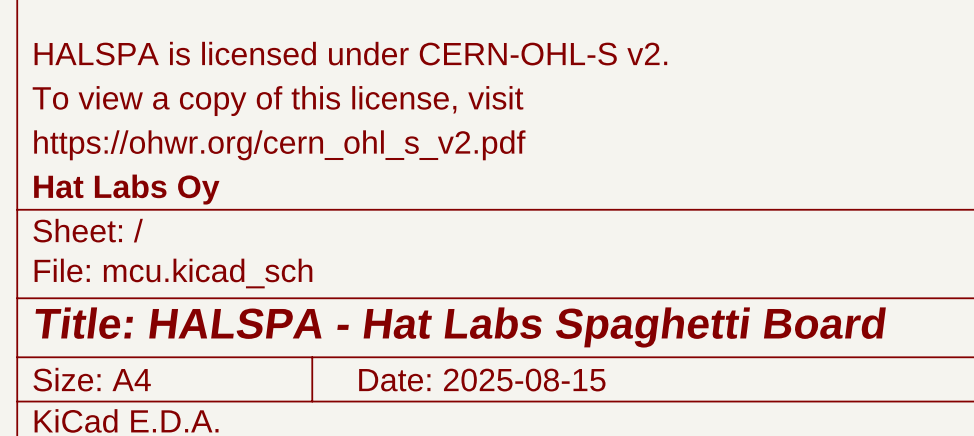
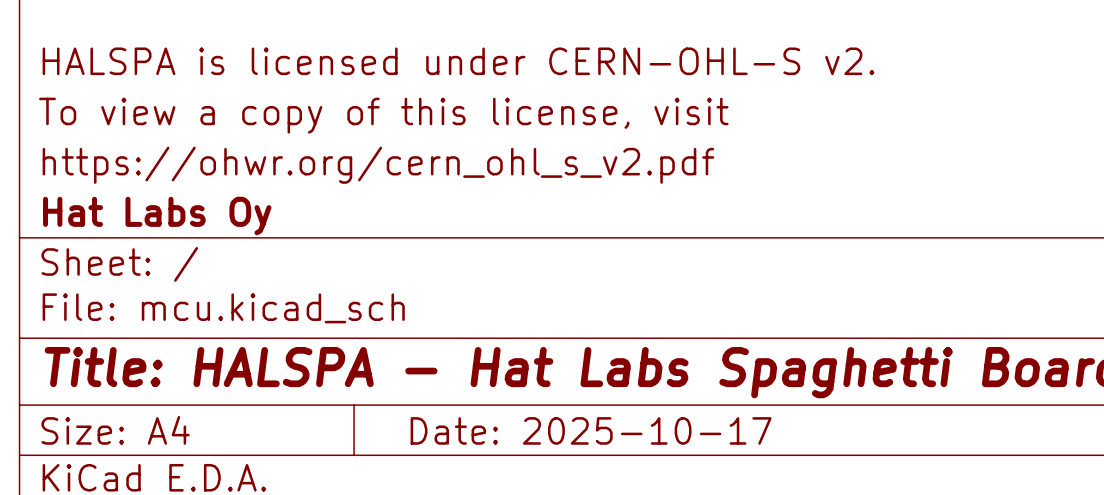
title block: Date: 2025-08-15 (482, 380) -> Date: 2025-10-17 (591, 430)

